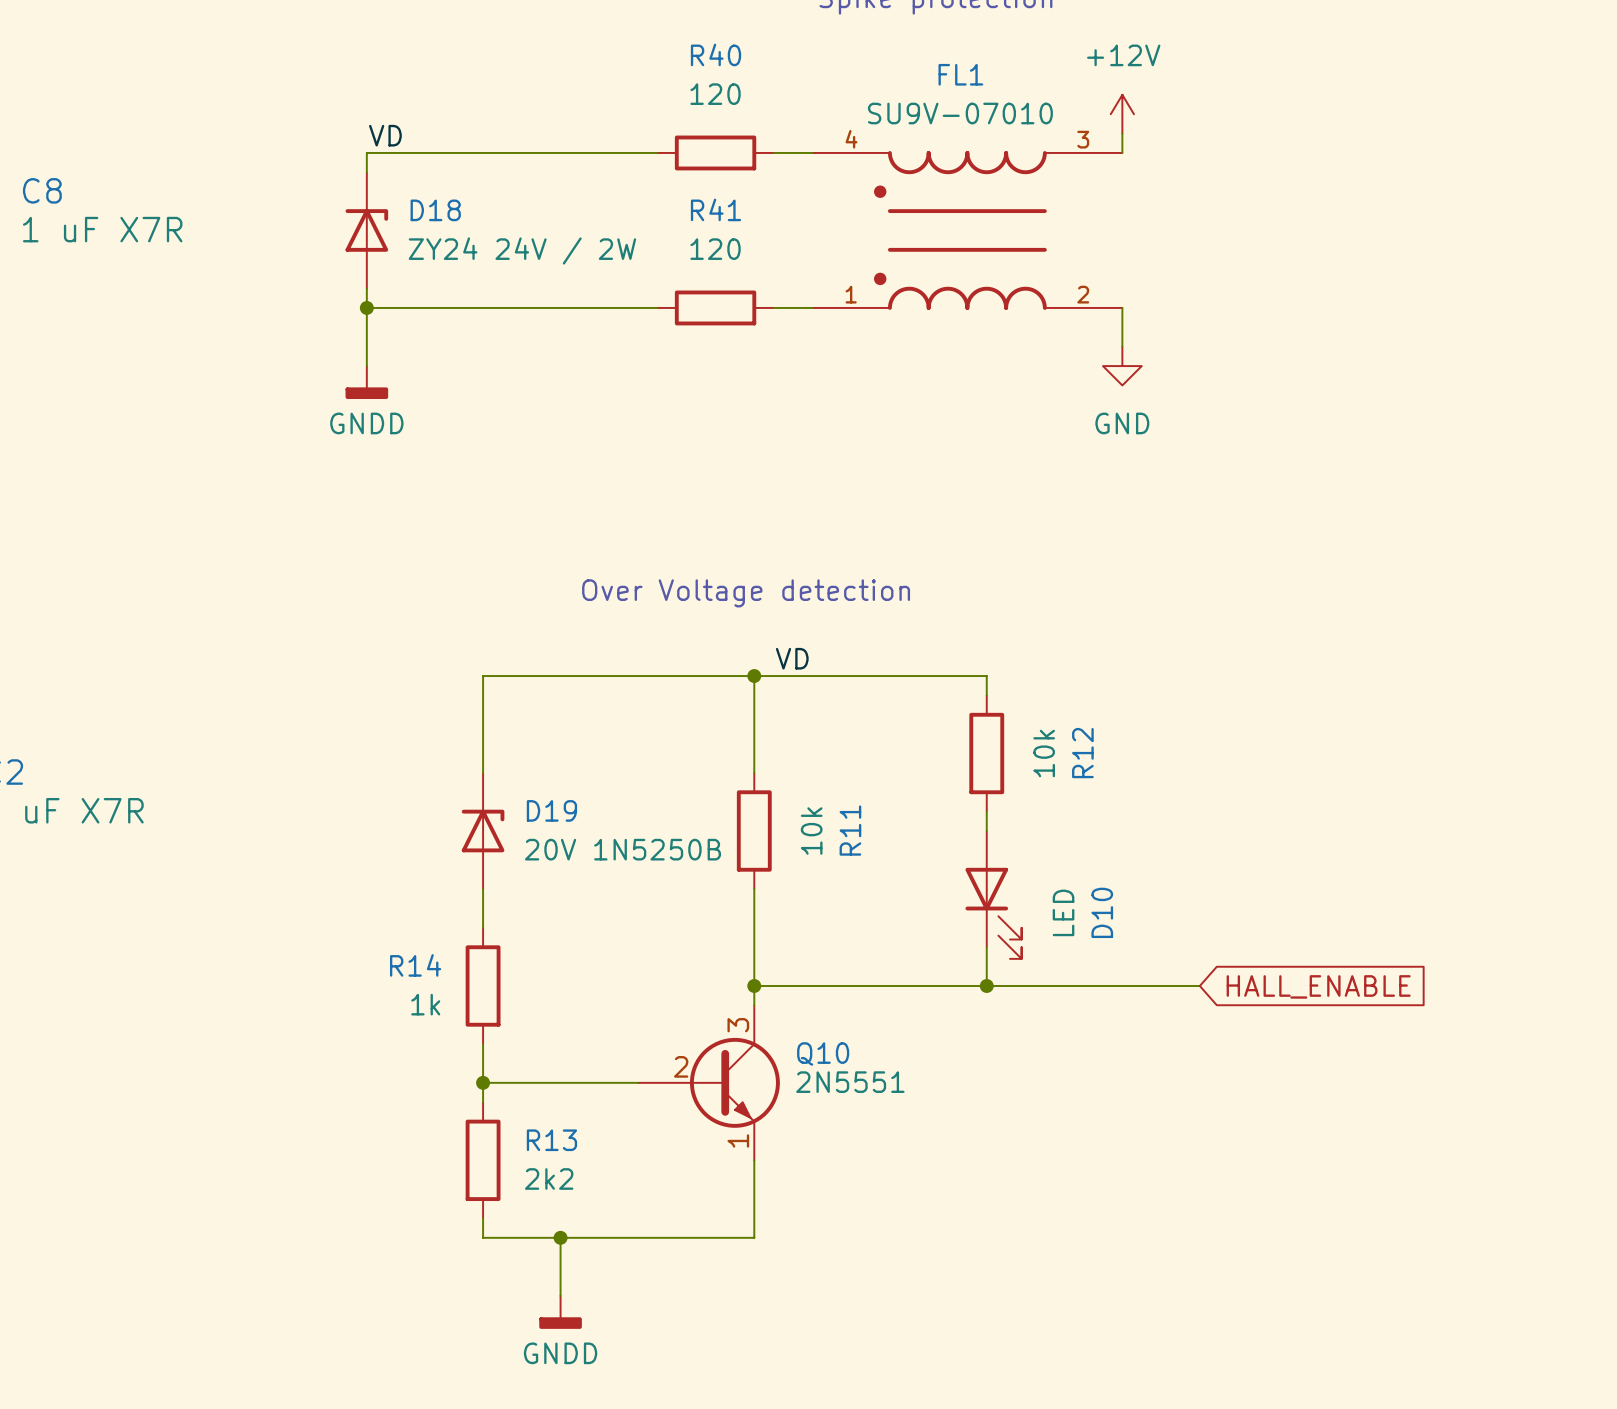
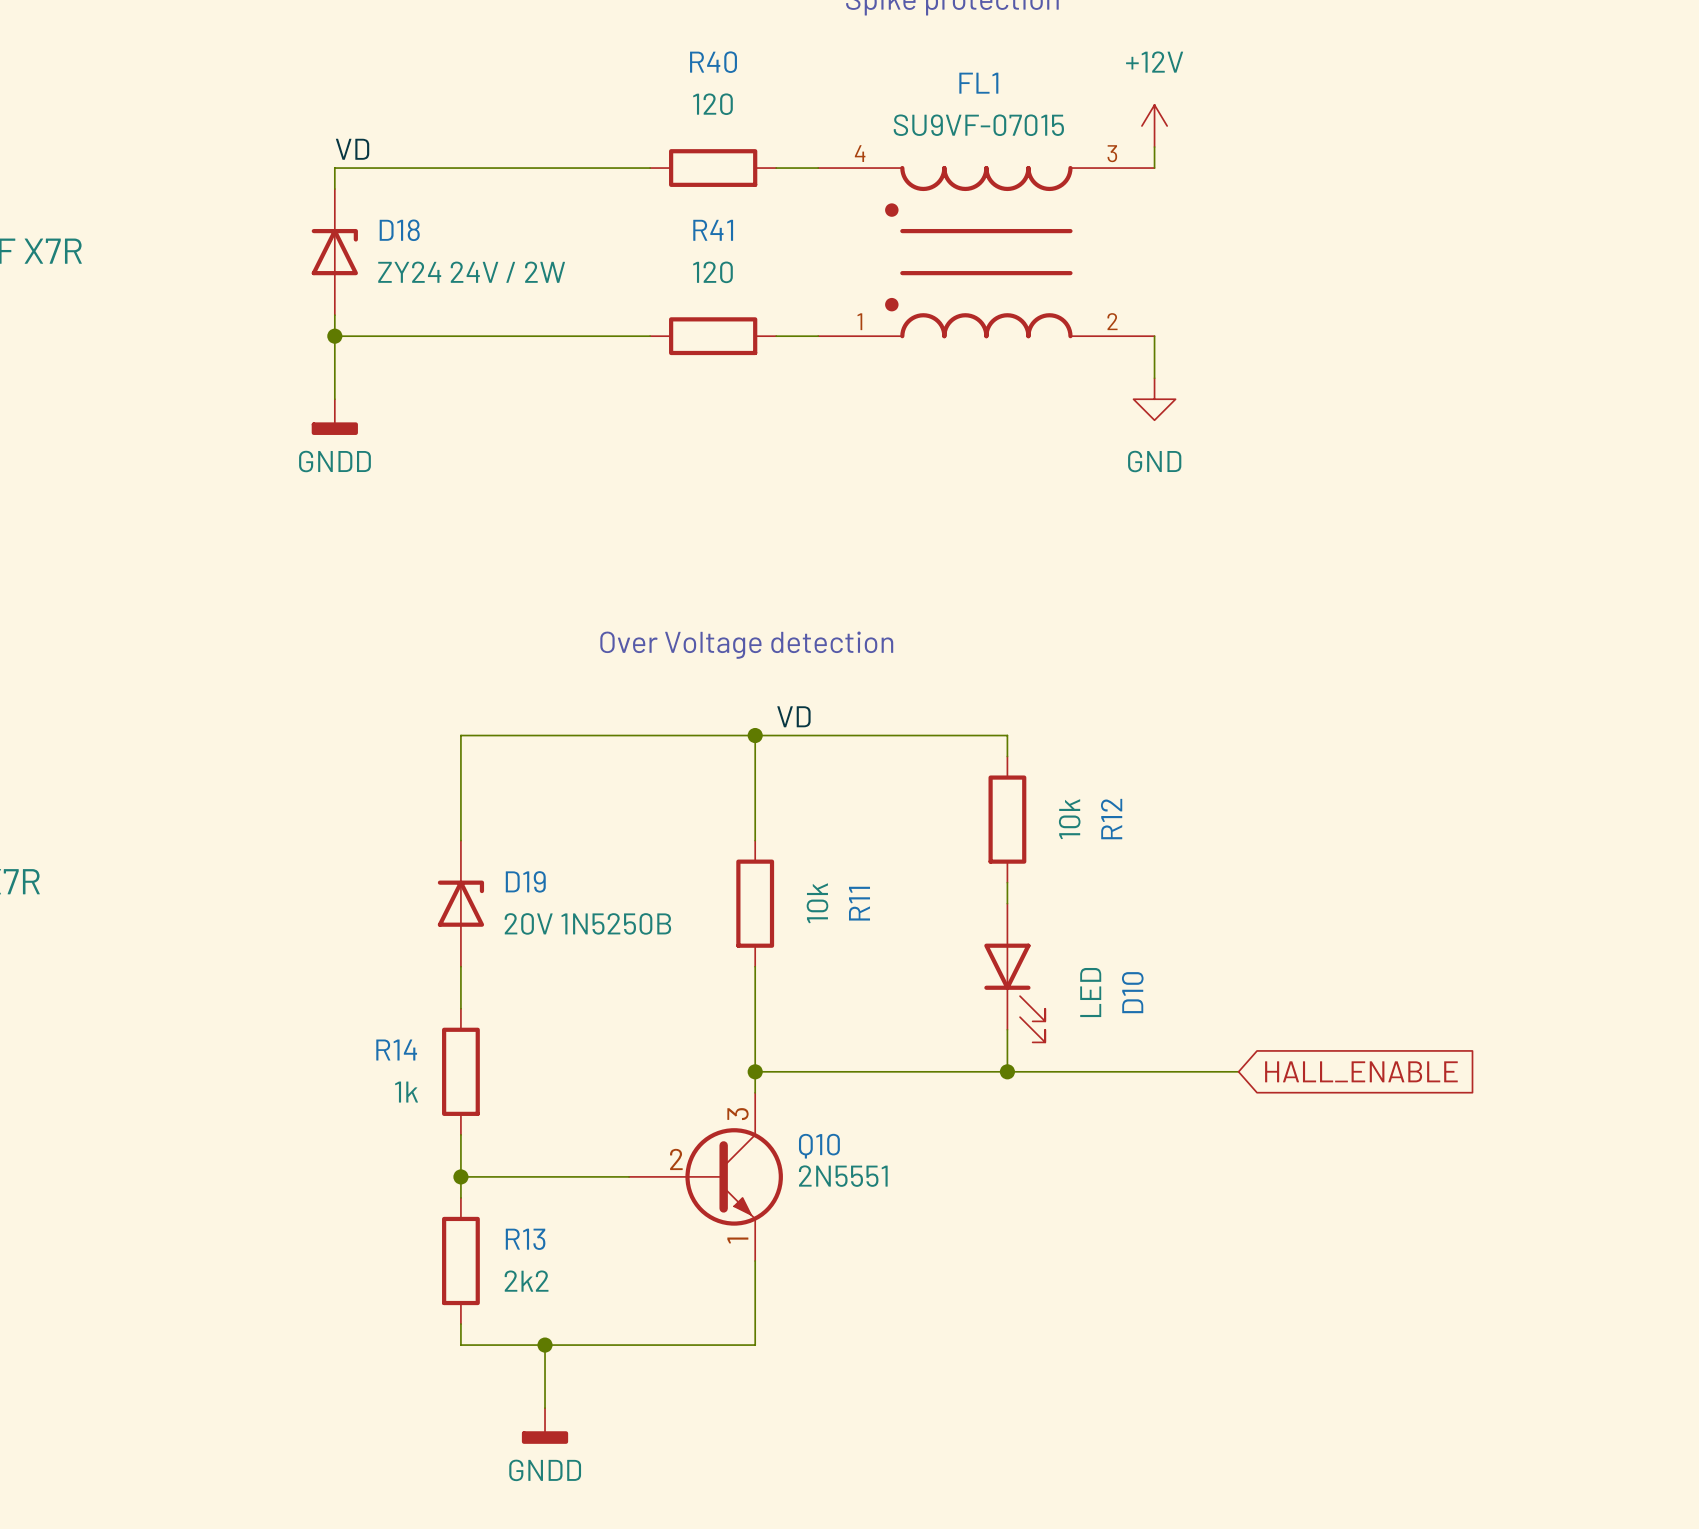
FL1 value: SU9V-07010 (960, 113) -> SU9VF-07015 (978, 125)

